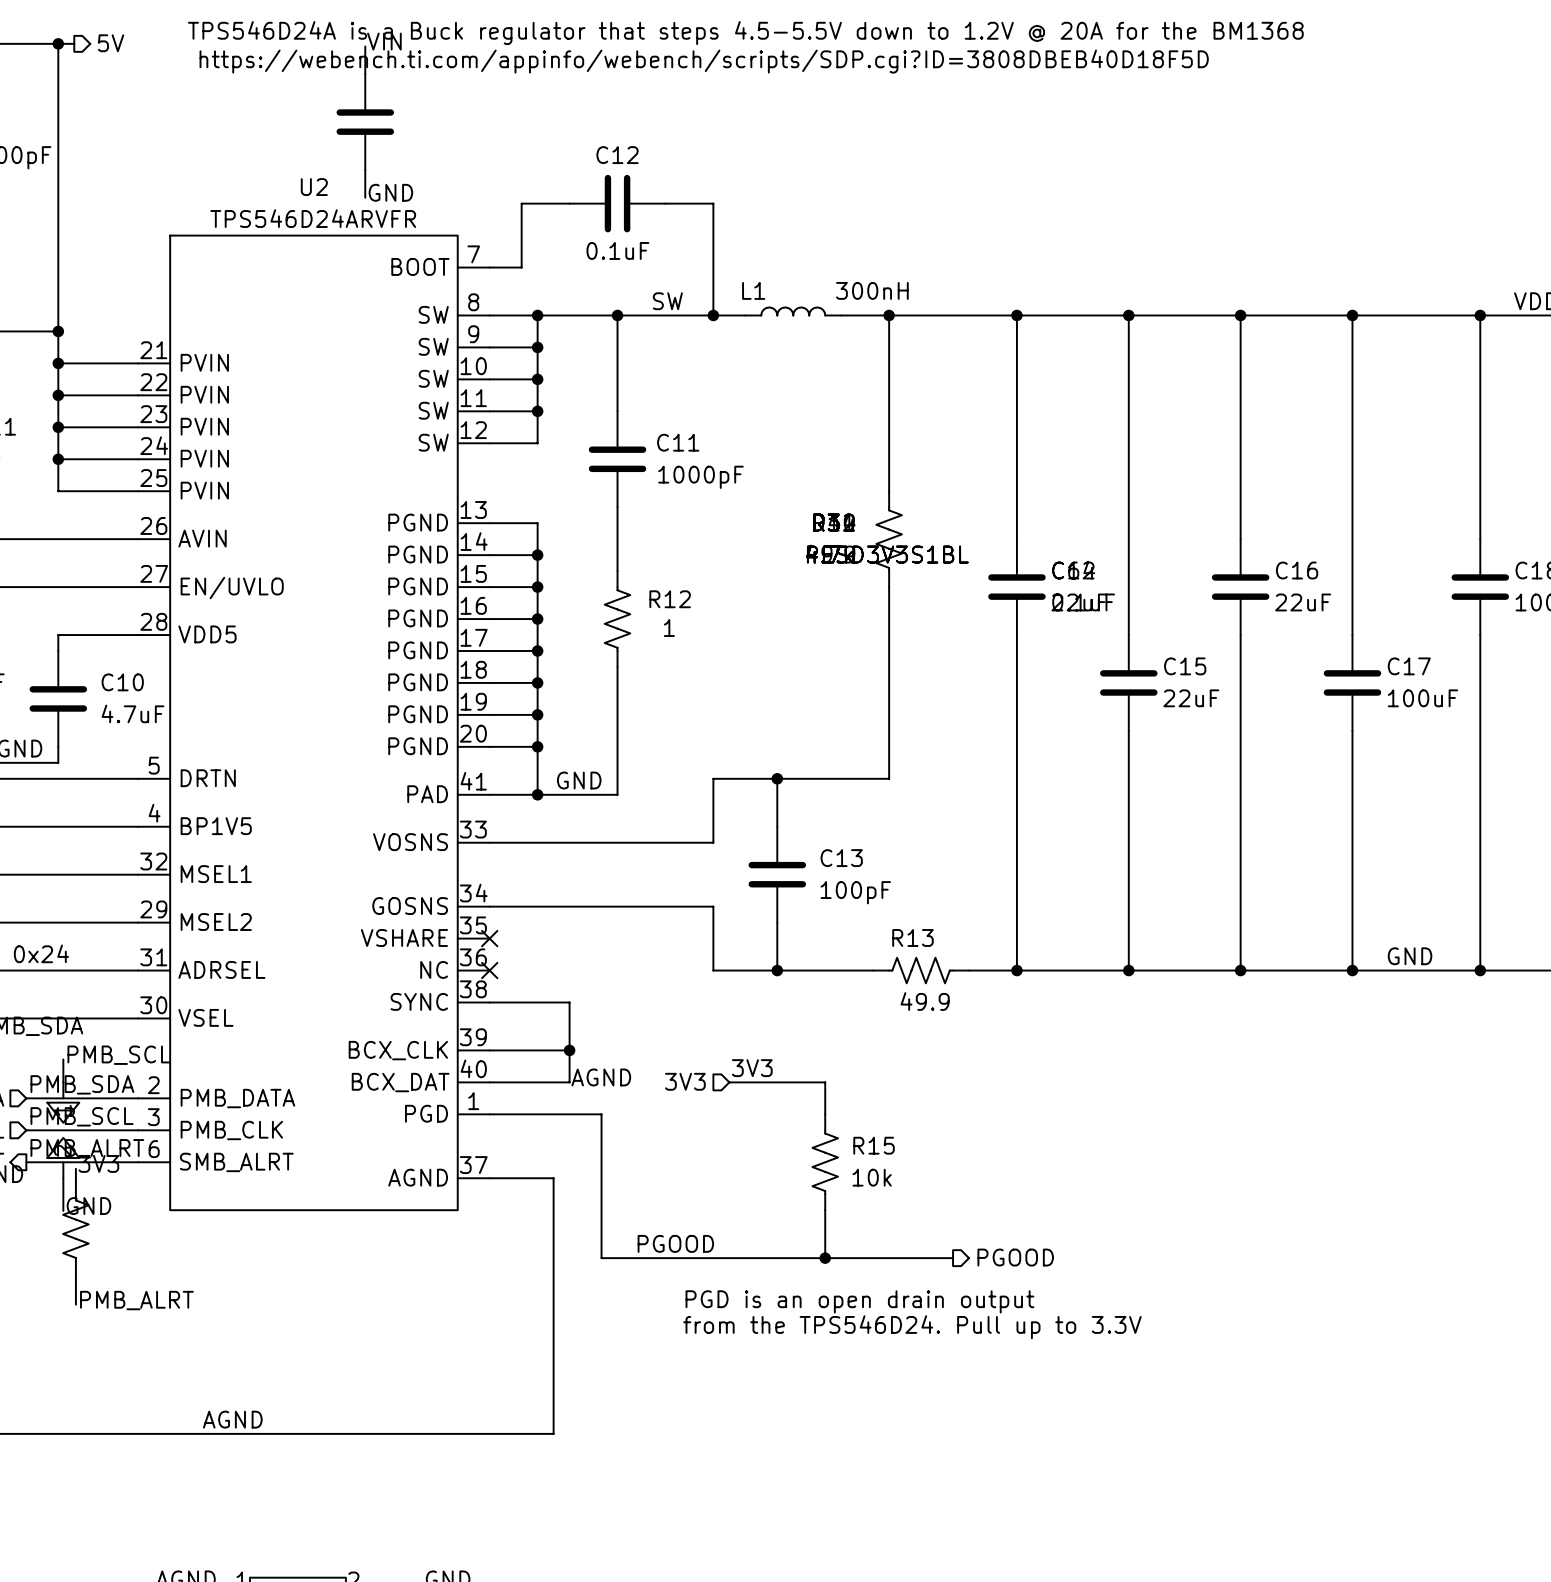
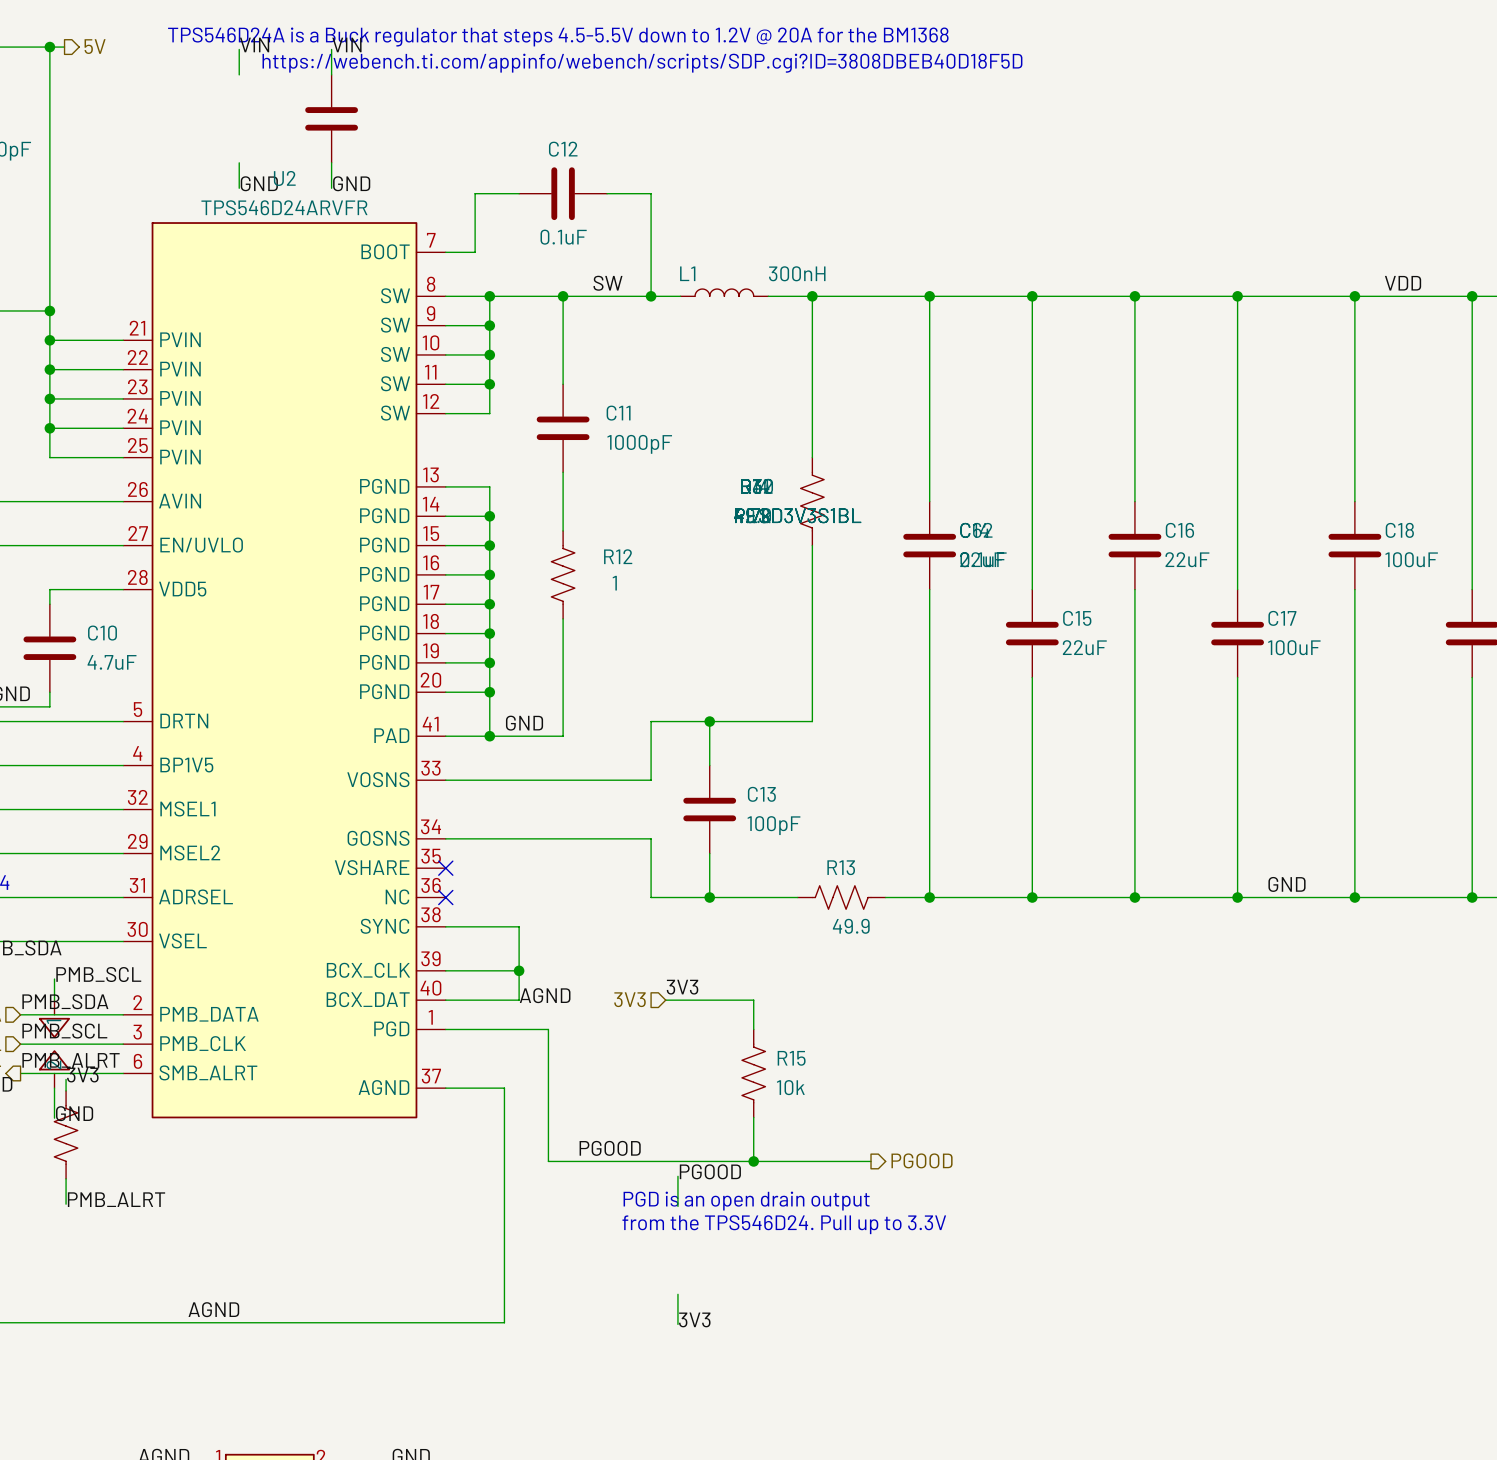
label: none -> VIN (254, 44)
wire: none -> (239, 49) (239, 74)
wire: none -> (239, 162) (239, 188)
label: none -> GND (259, 183)
label: none -> PGOOD (710, 1171)
wire: none -> (677, 1176) (677, 1206)
wire: none -> (677, 1294) (677, 1324)
label: none -> 3V3 (694, 1319)

